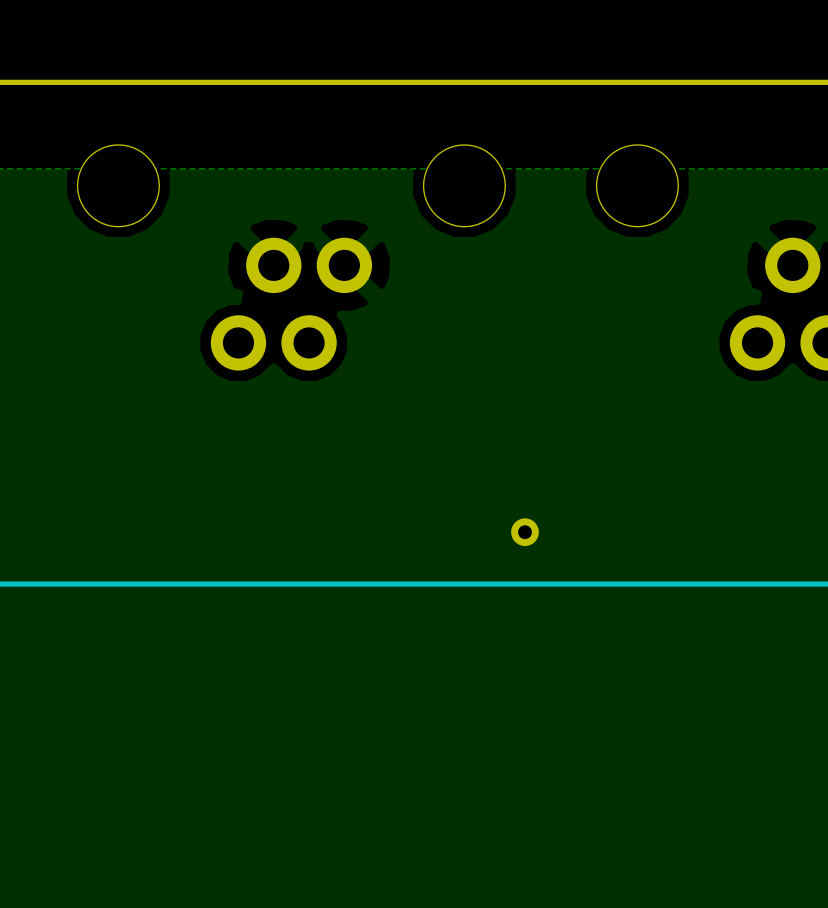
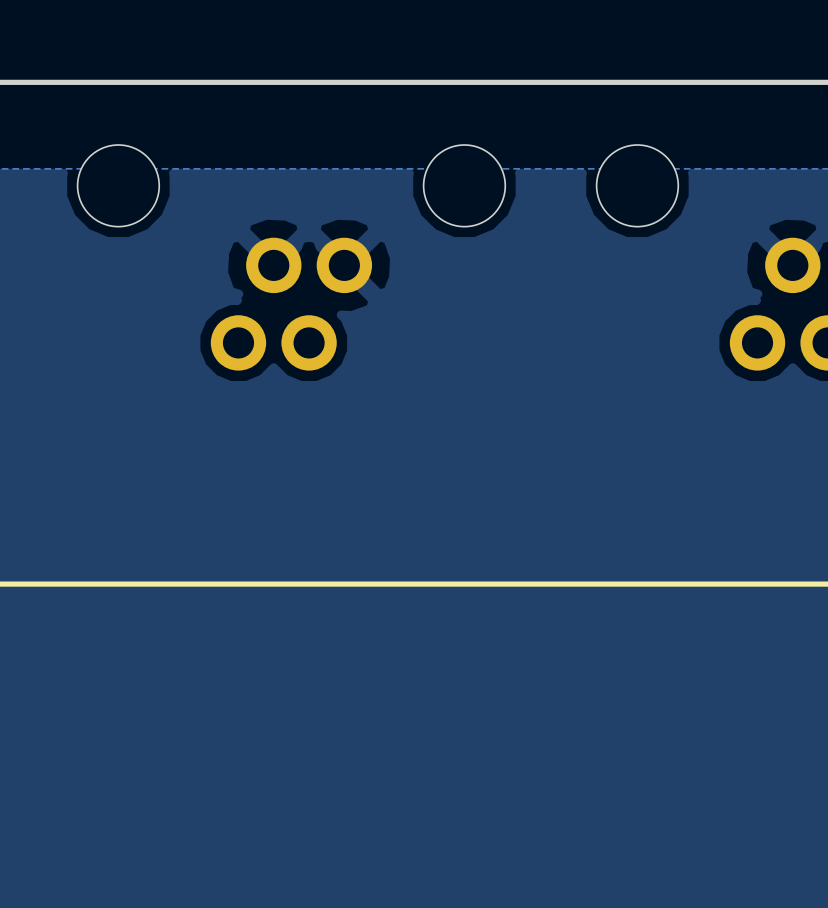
part: (524, 532) -> none

